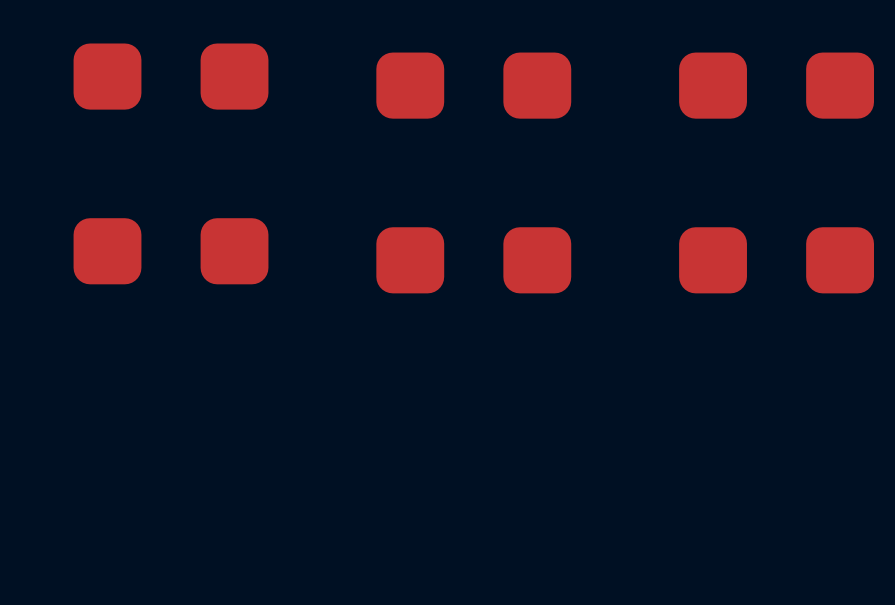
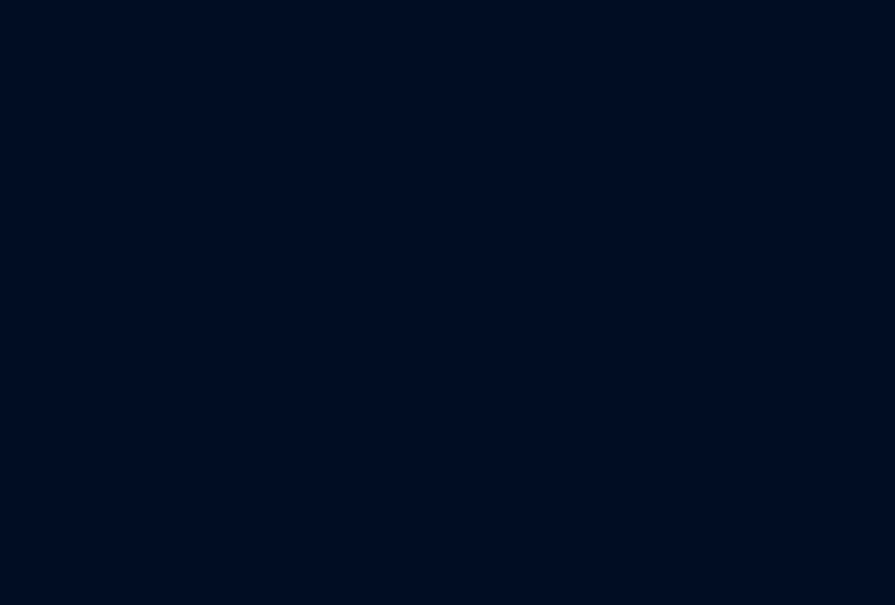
part: (171, 76) -> none
part: (473, 85) -> none
part: (776, 85) -> none
part: (171, 251) -> none
part: (473, 260) -> none
part: (776, 260) -> none

